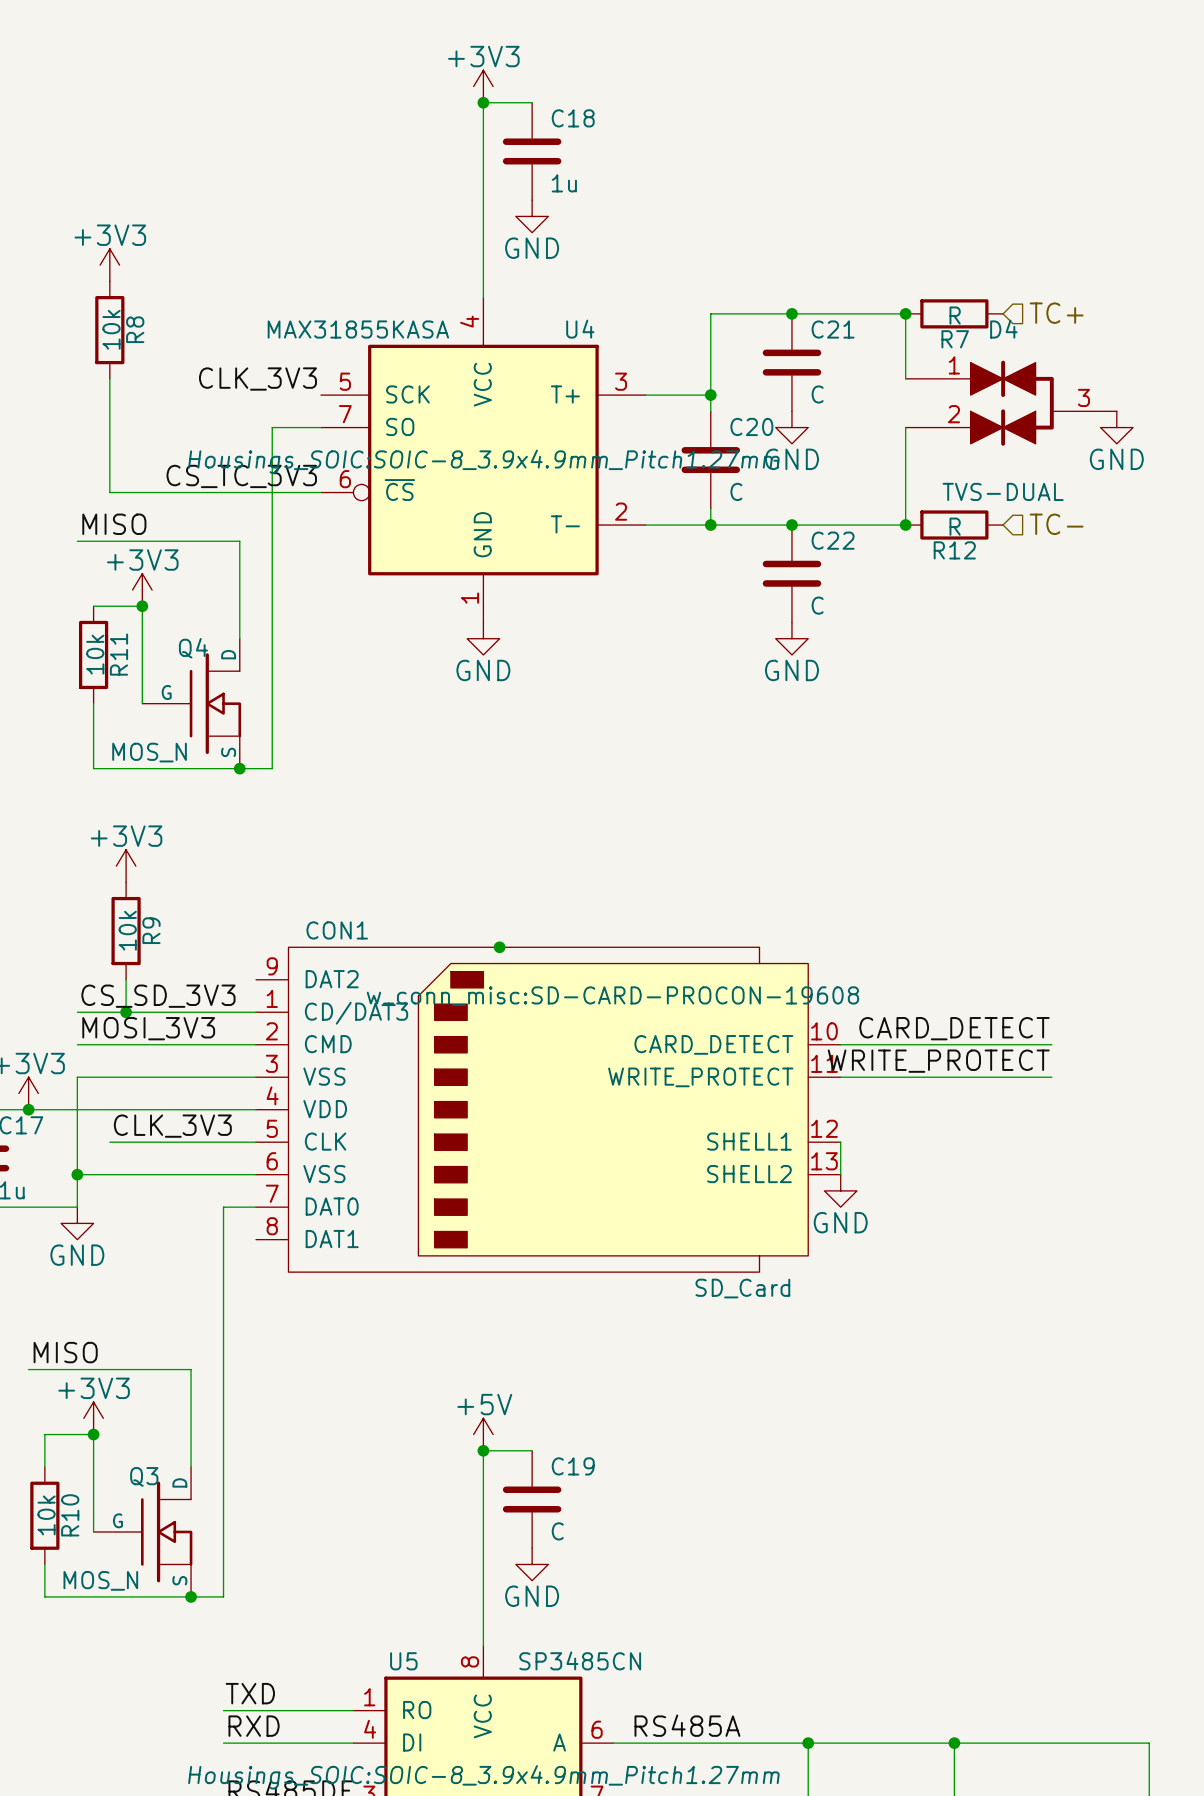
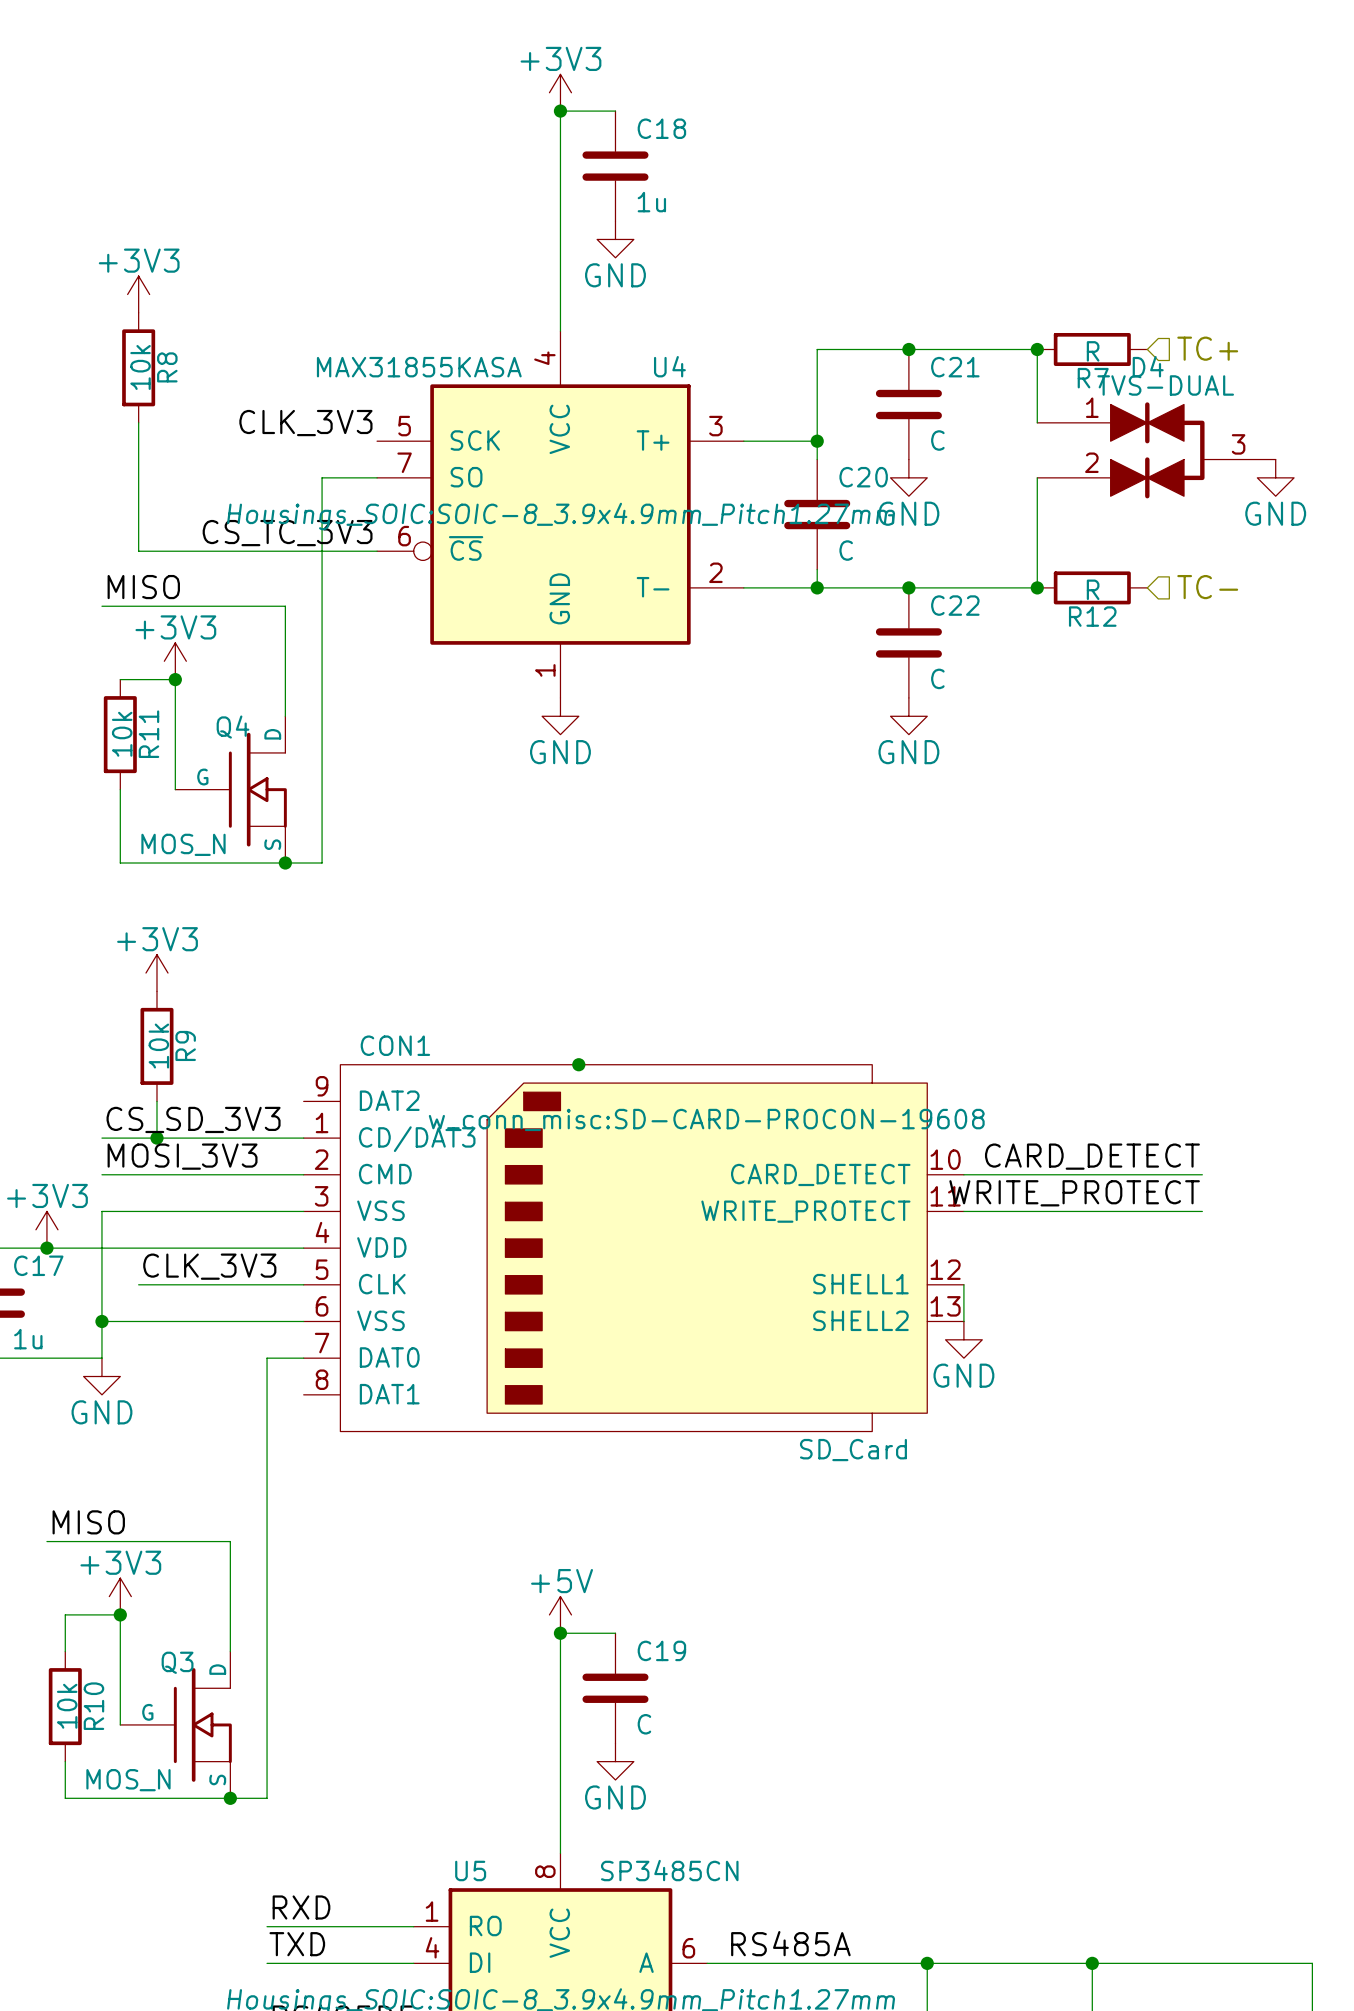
D4 value position: TVS-DUAL (1003, 491) -> TVS-DUAL (1165, 385)
label: TXD (250, 1693) -> RXD (301, 1907)
label: RXD (254, 1726) -> TXD (297, 1944)

